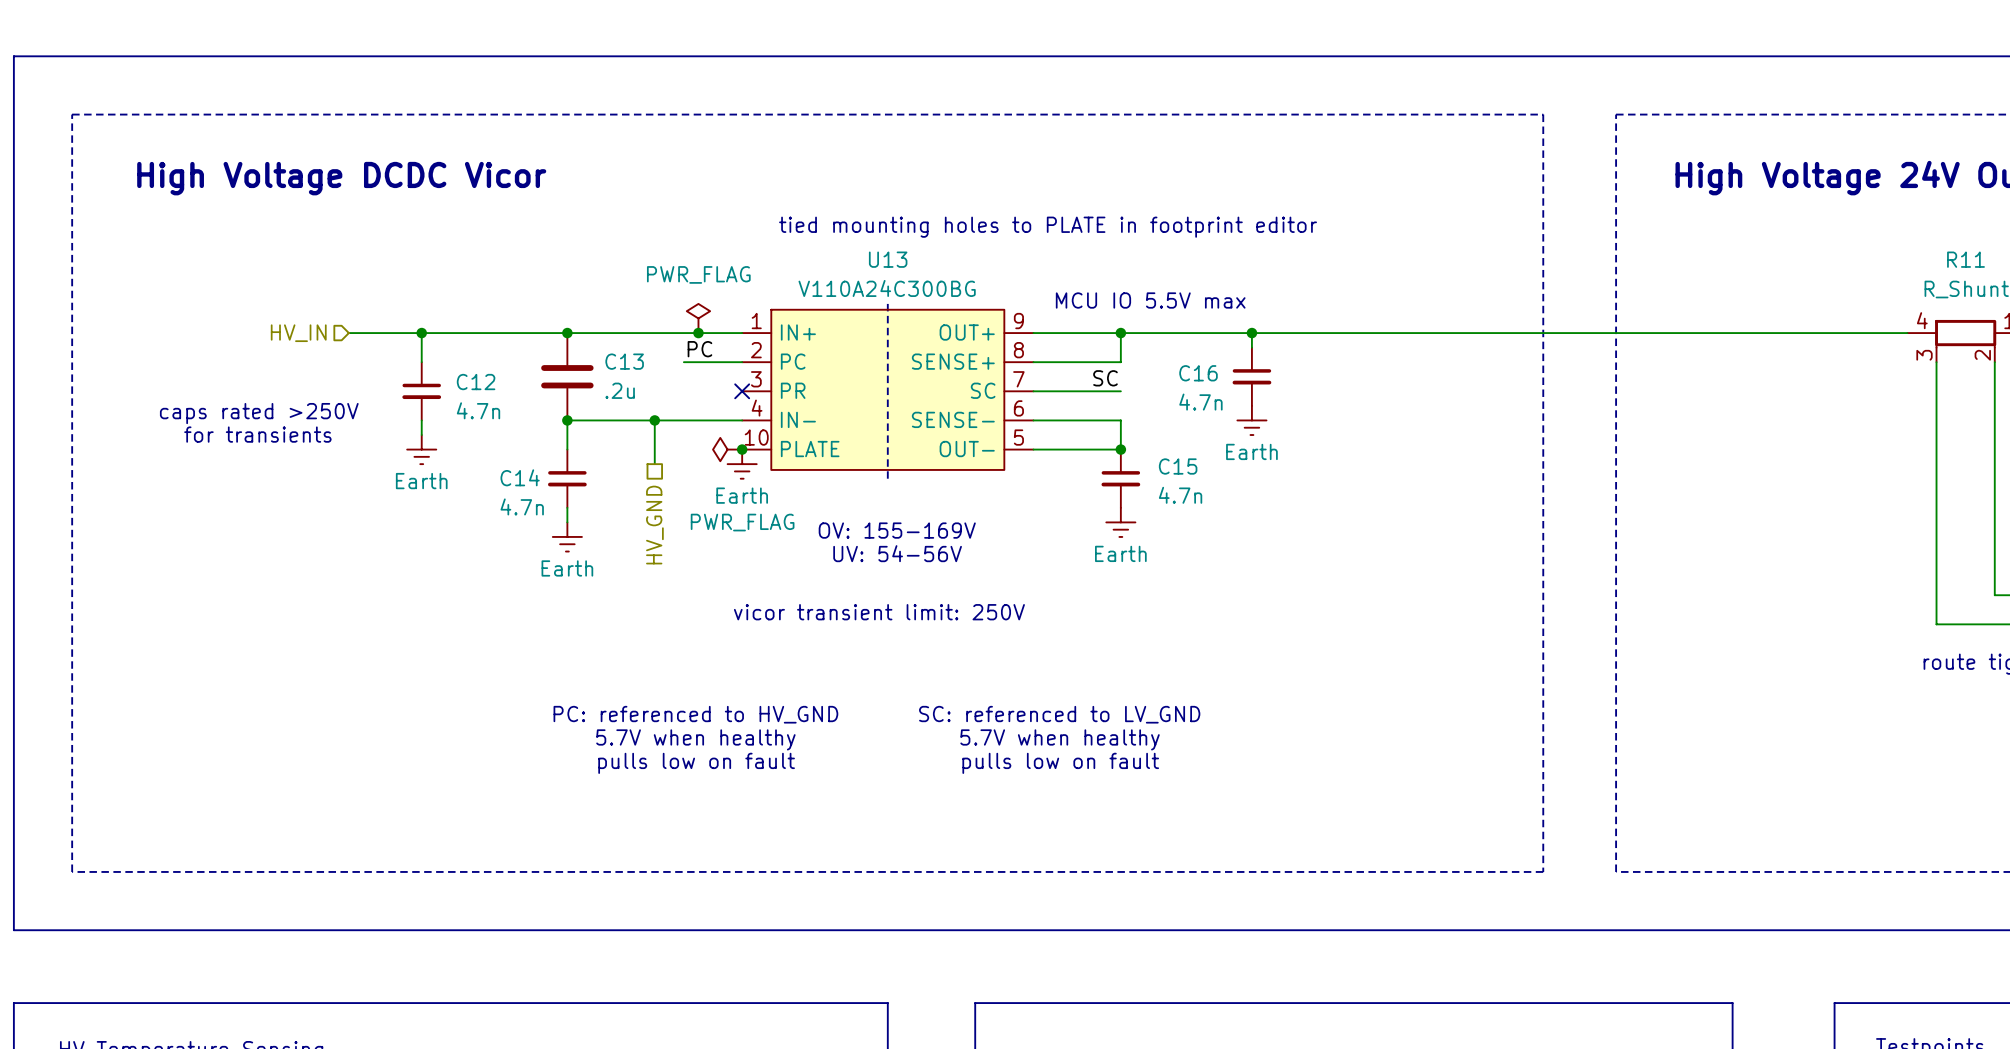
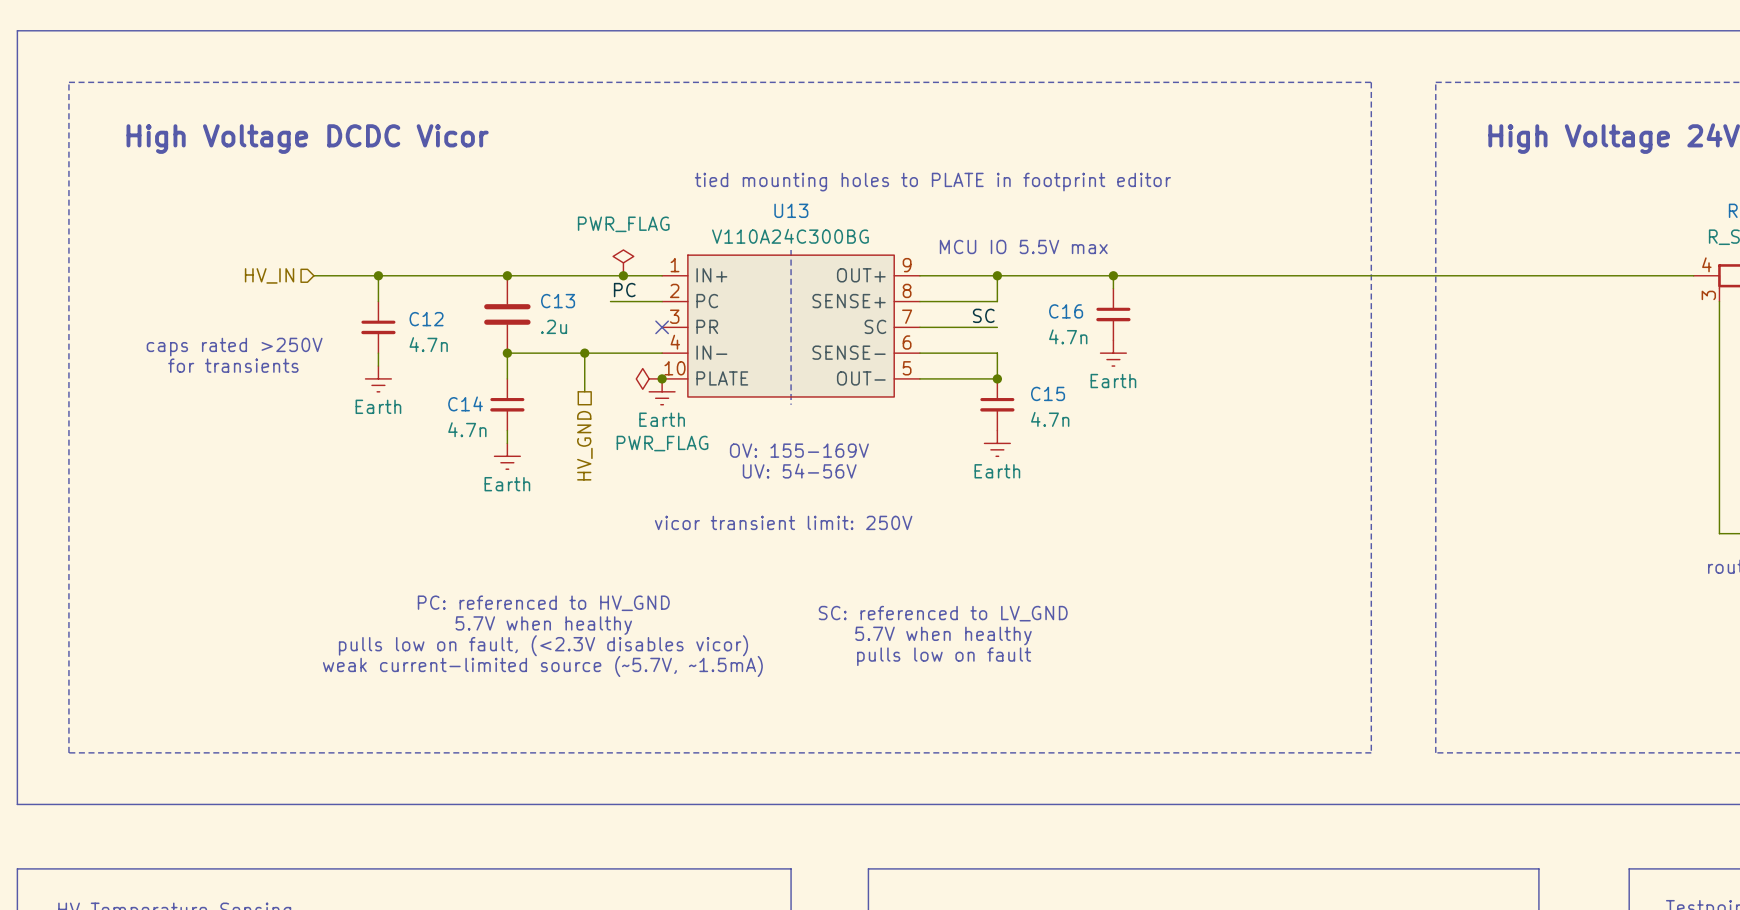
text position: PC: referenced to HV_GND (695, 714) -> PC: referenced to HV_GND (543, 603)
text position: 5.7V when healthy (695, 739) -> 5.7V when healthy (543, 625)
text: none -> pulls low on fault, (<2.3V disables vicor) (543, 645)
text: pulls low on fault (696, 763) -> none
text: none -> weak current-limited source (~5.7V, ~1.5mA) (542, 666)

